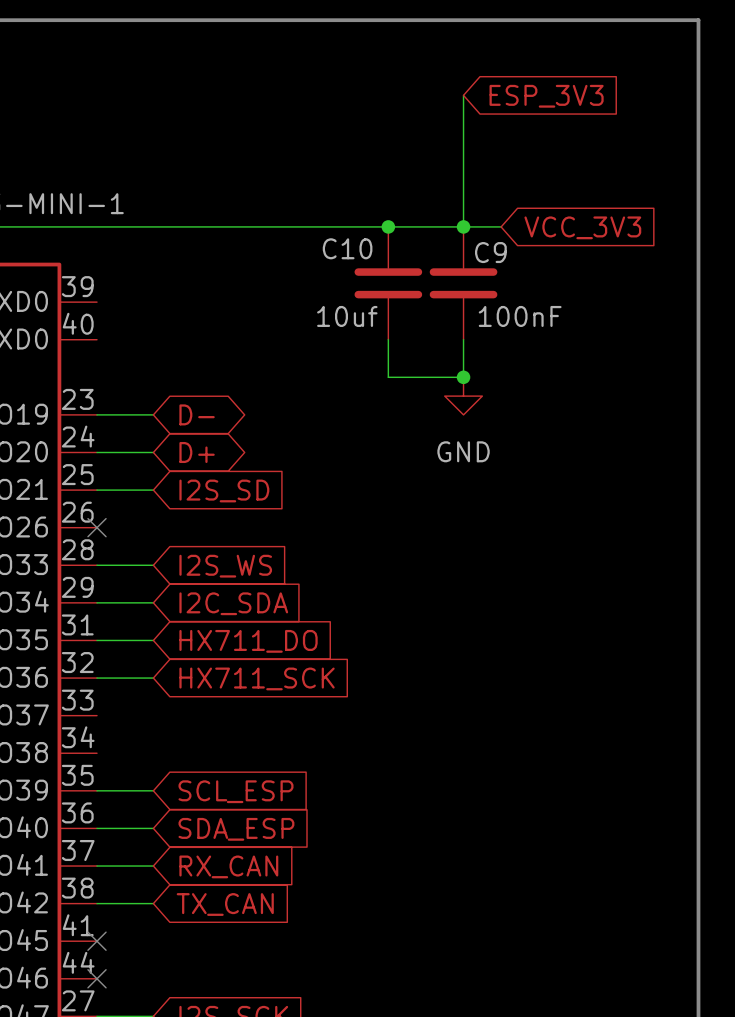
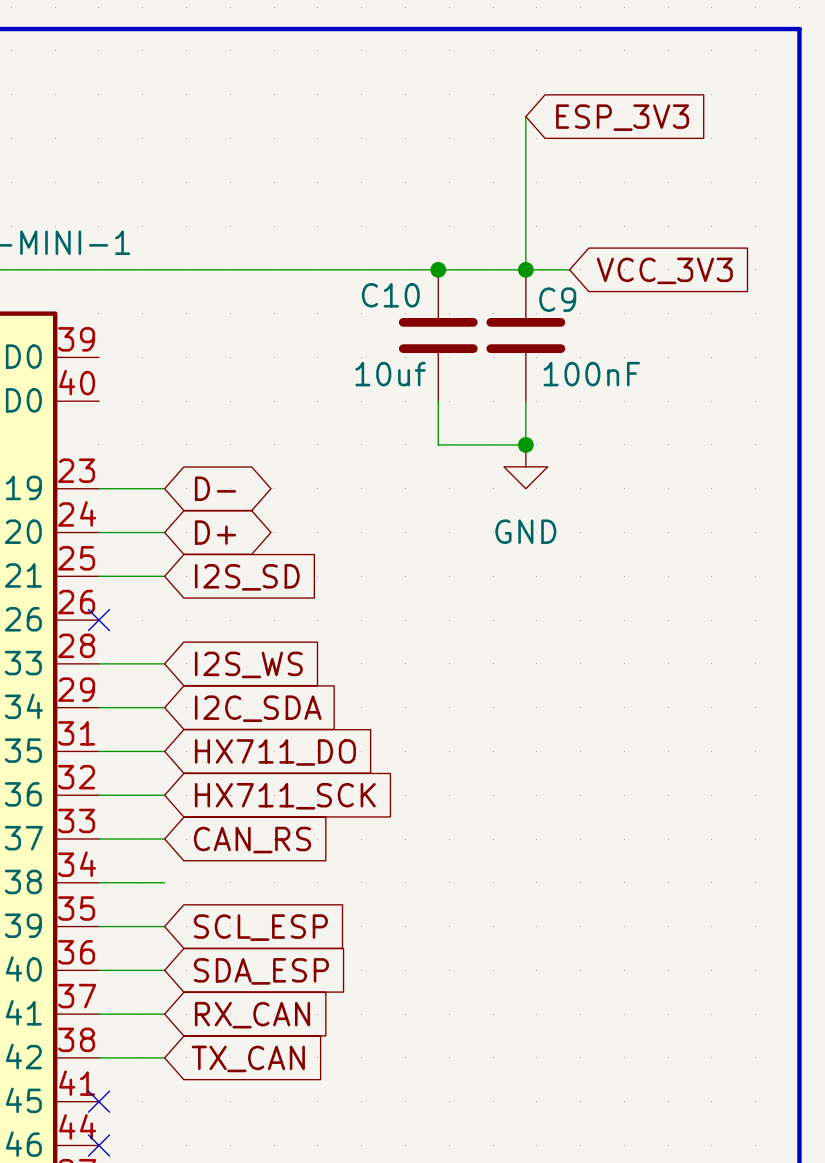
wire: none -> (98, 839) (164, 839)
global label: none -> CAN_RS (252, 840)
wire: none -> (98, 882) (164, 882)

